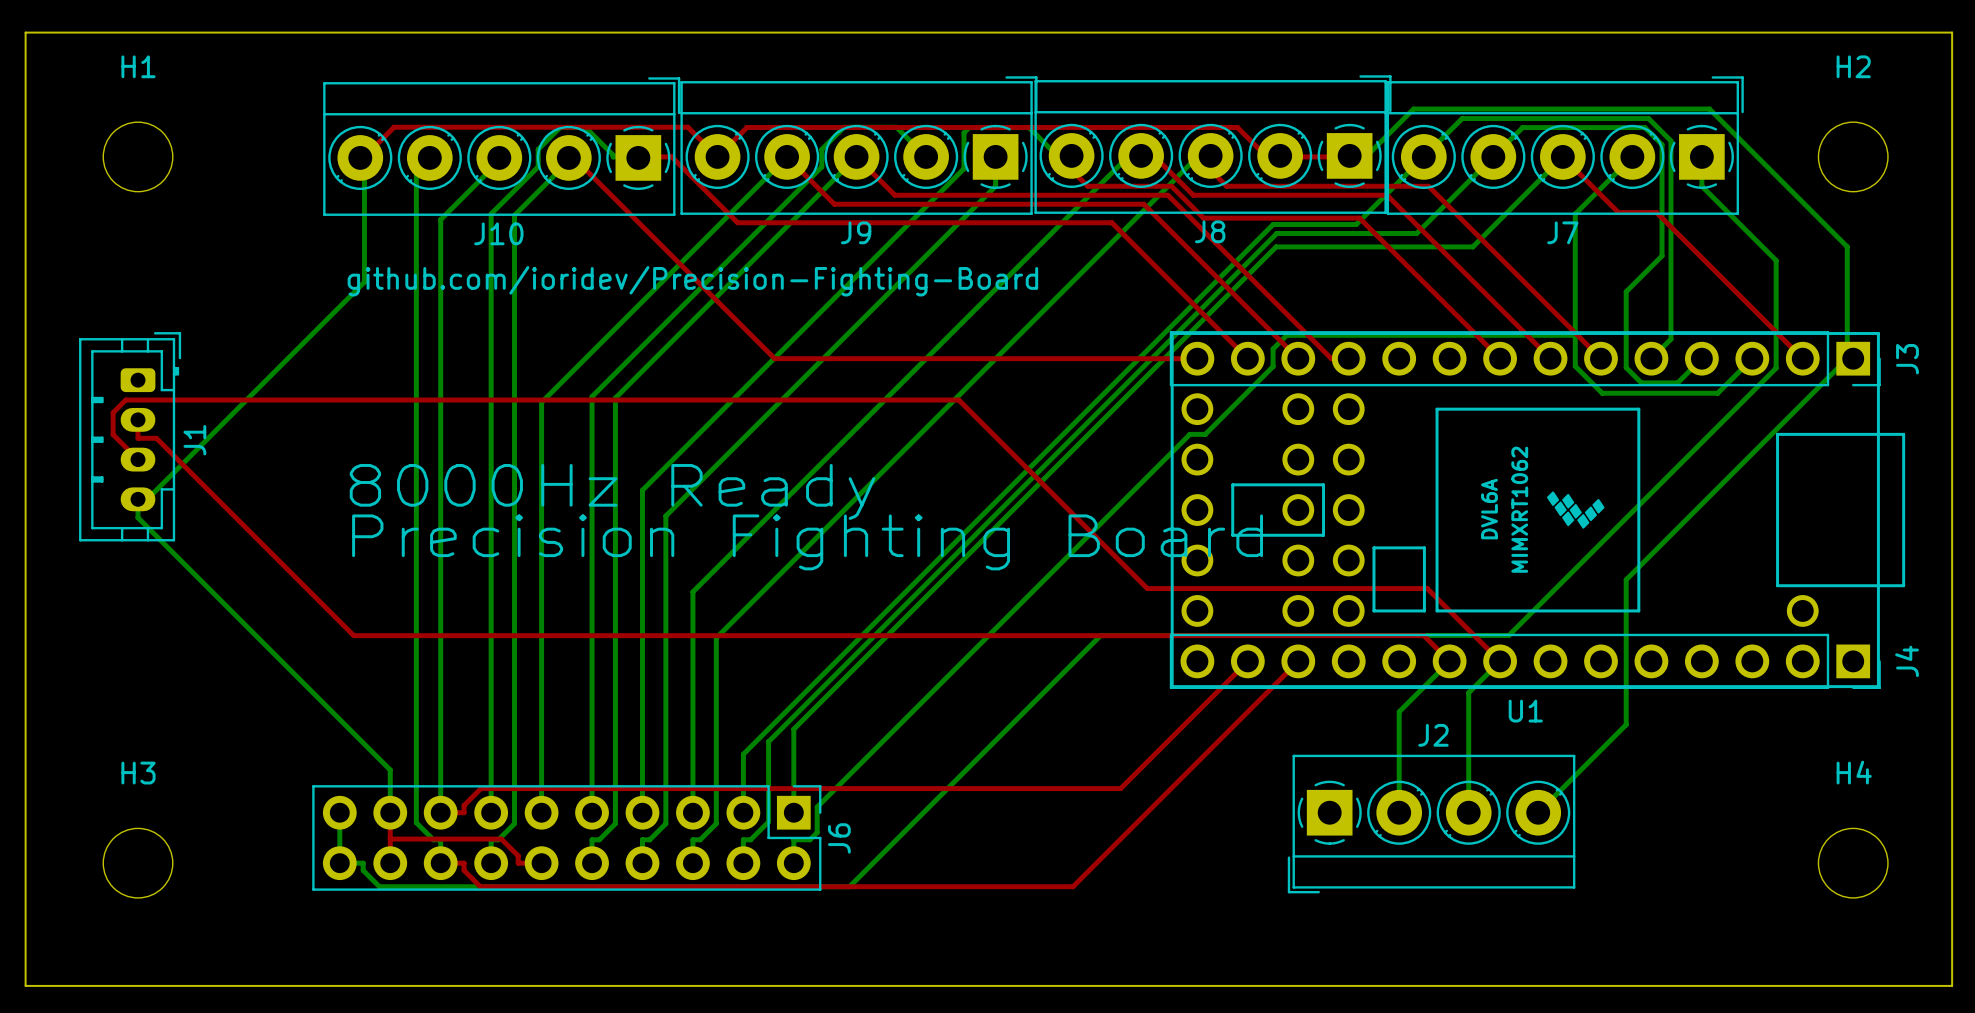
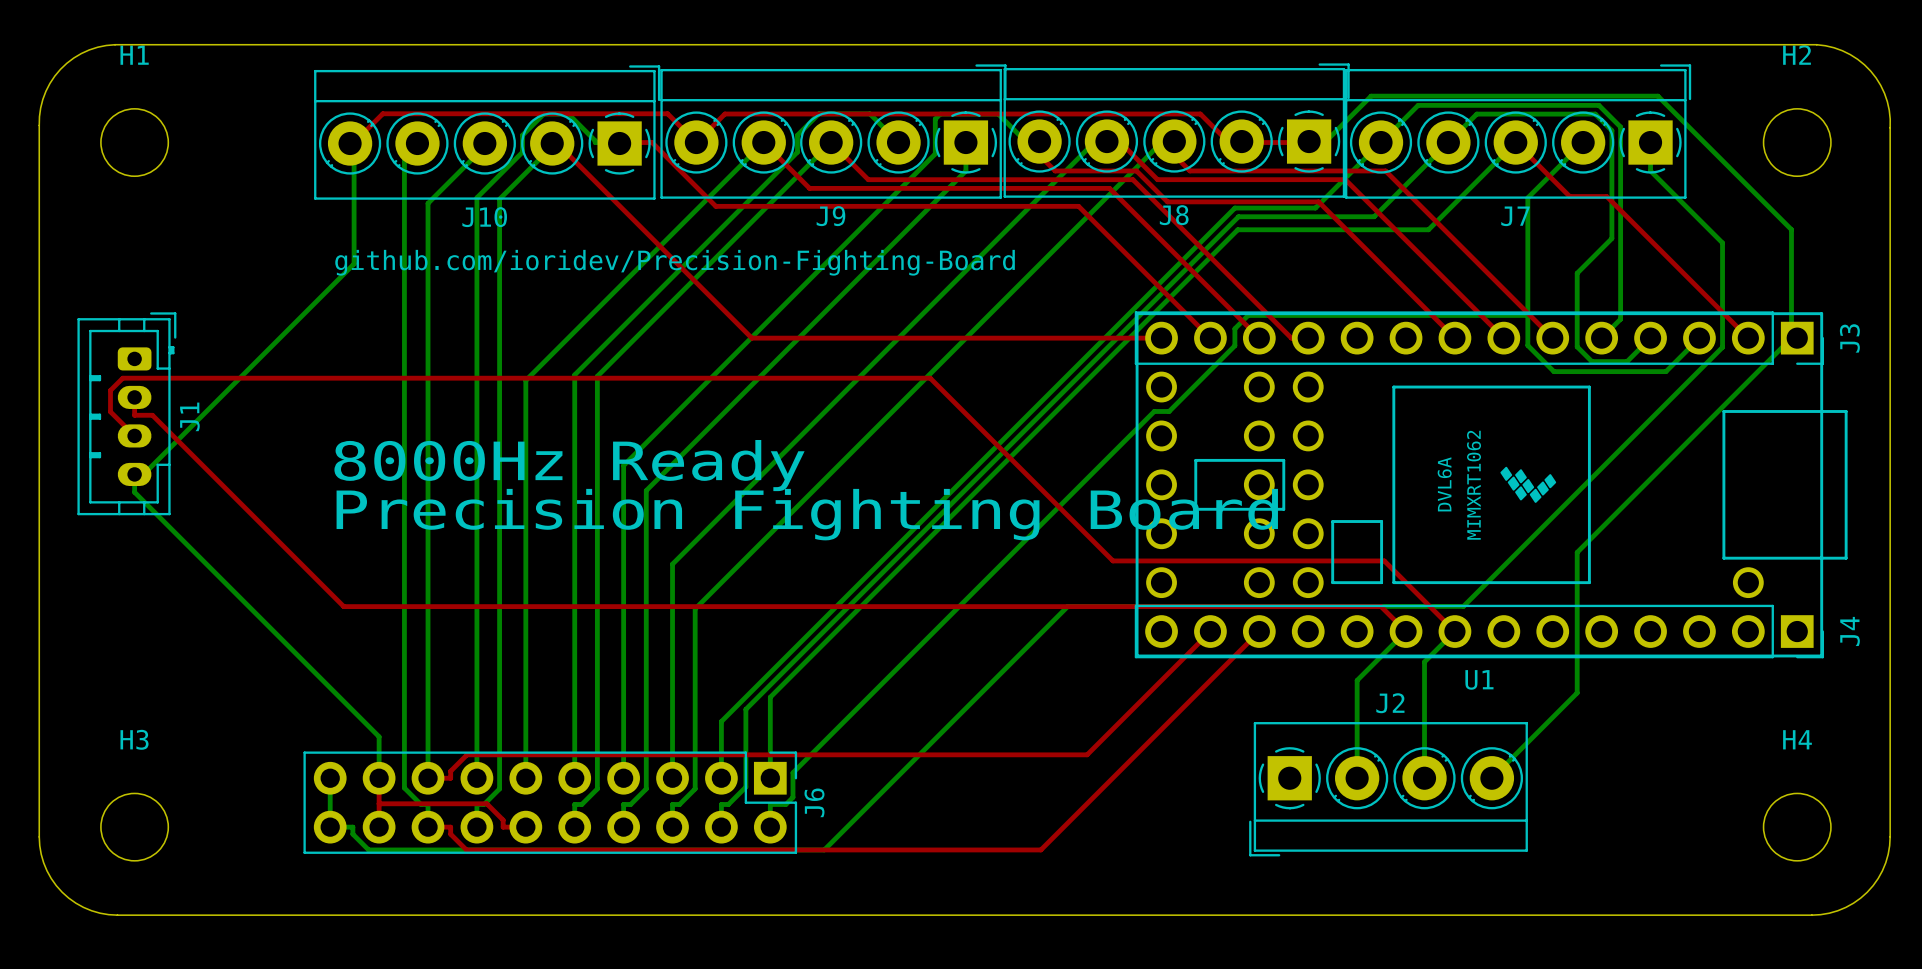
board edge: (25, 32) (1952, 32) (1952, 985) (25, 985) (25, 32) -> (115, 44) (89, 49) (66, 63) (49, 83) (42, 99) (39, 116) (39, 836) (43, 862) (51, 878) (68, 898) (83, 907) (100, 913) (117, 915) (1811, 915) (1829, 913) (1853, 903) (1867, 892) (1882, 870) (1888, 854) (1890, 836) (1890, 119) (1887, 101) (1876, 78) (1864, 64) (1842, 50) (1816, 44) (115, 44)

